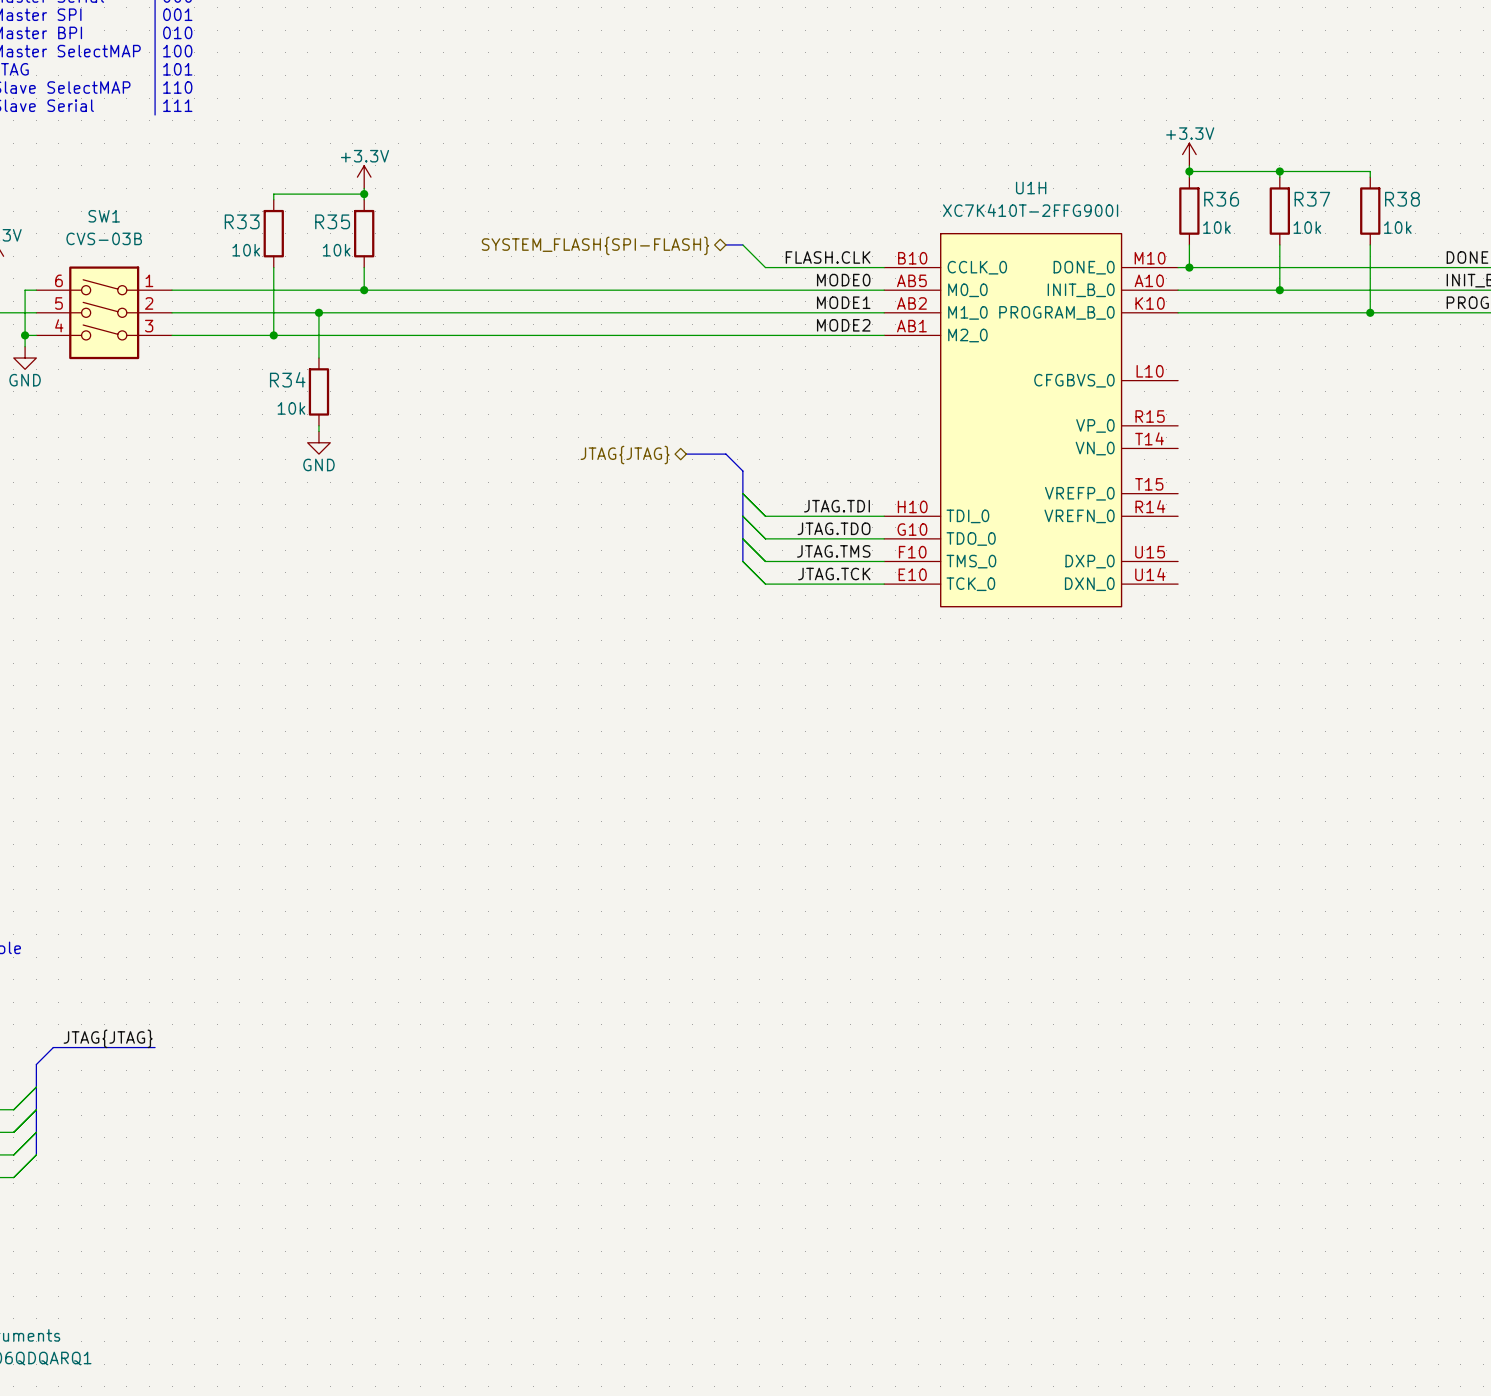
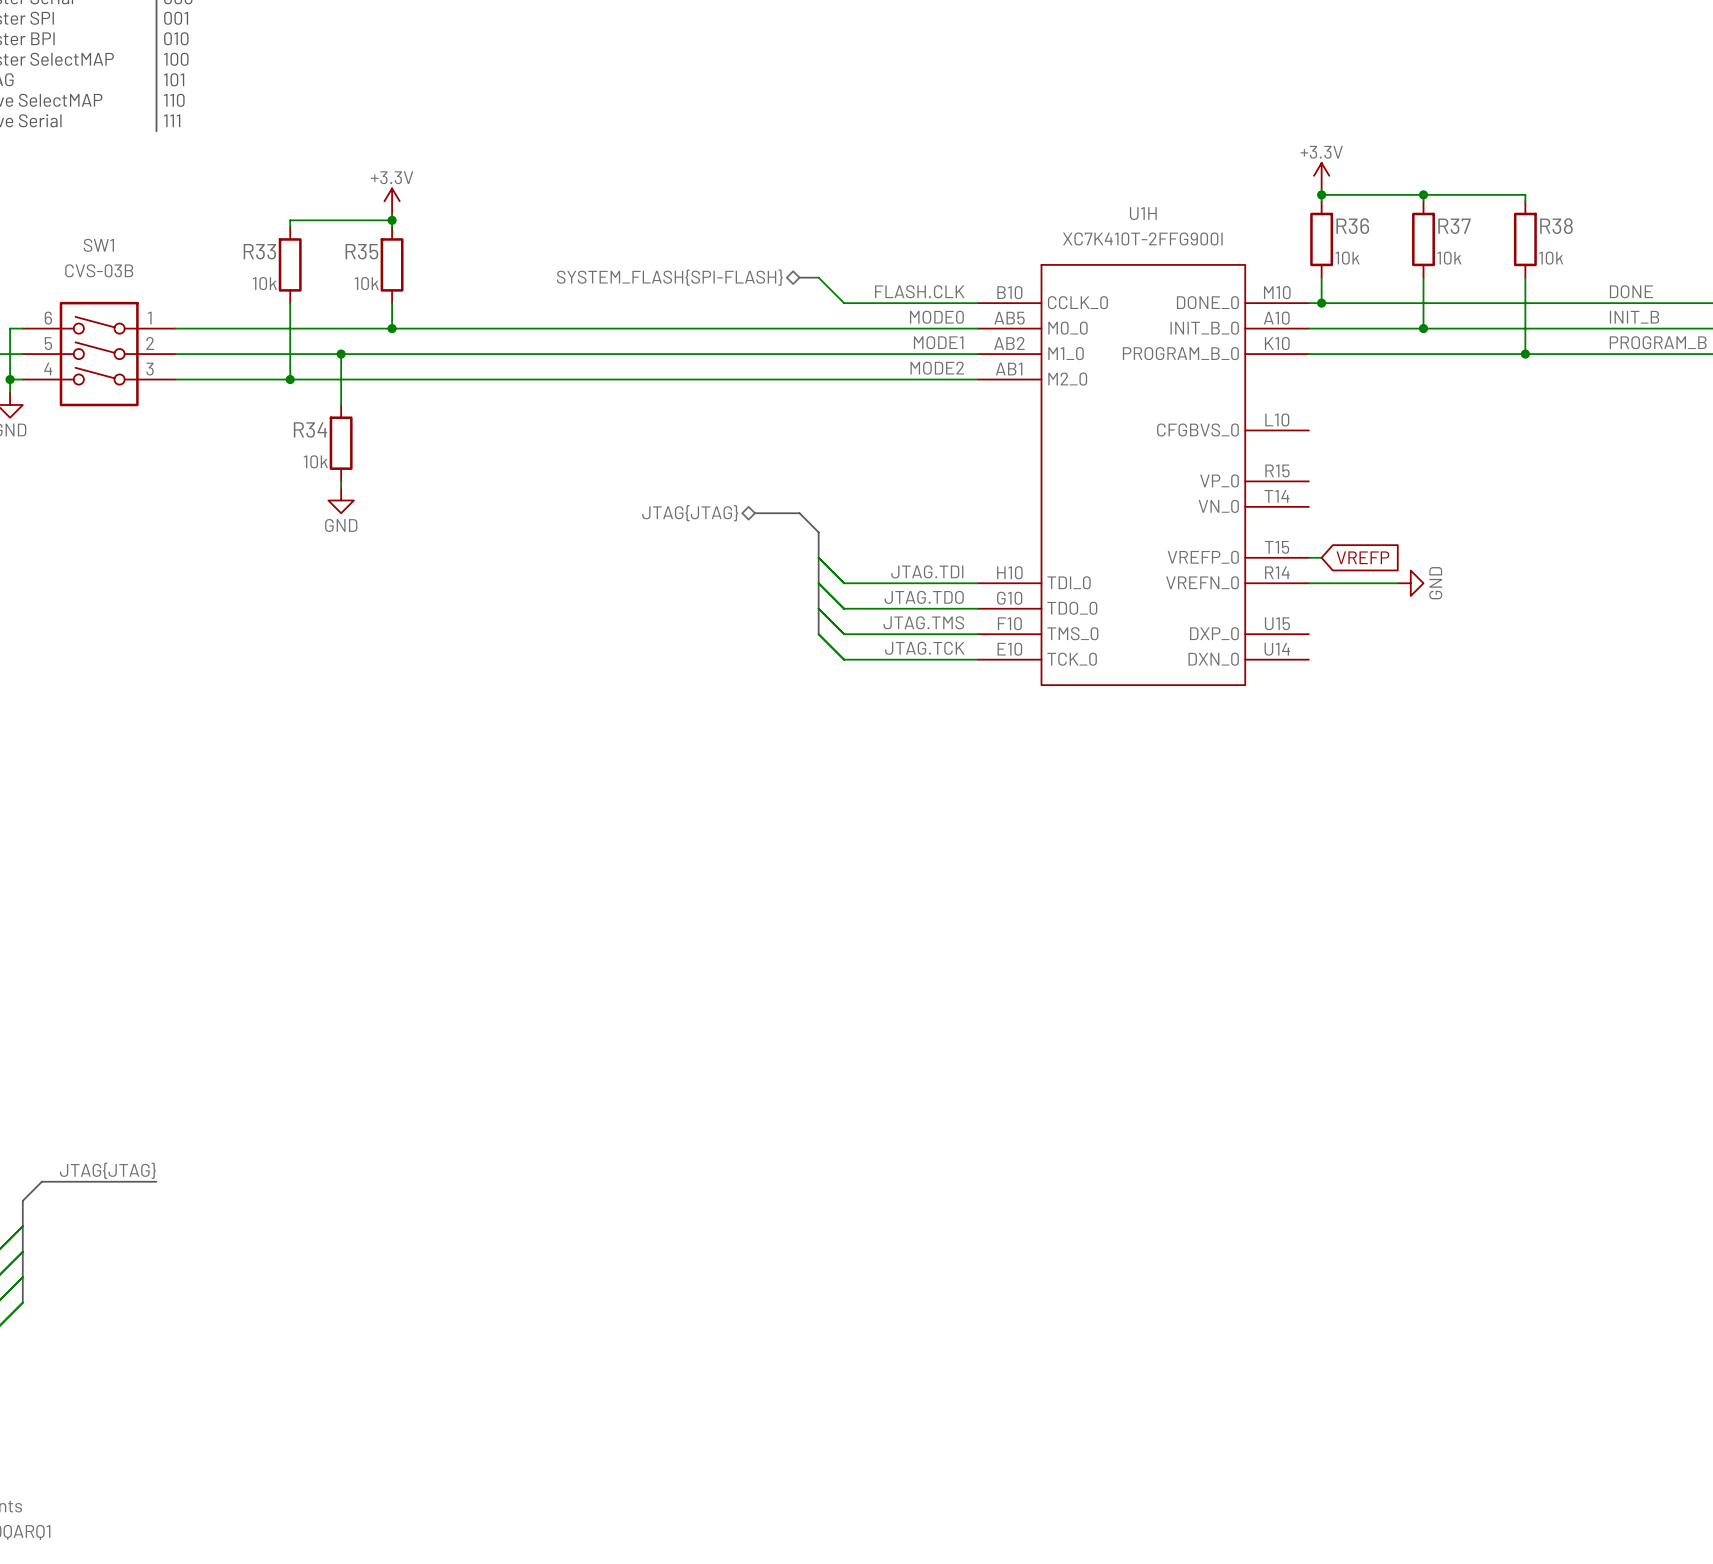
wire: none -> (1308, 557) (1321, 557)
global label: none -> VREFP (1362, 557)
wire: none -> (1308, 583) (1398, 583)
power symbol: none -> GND (1410, 583)

